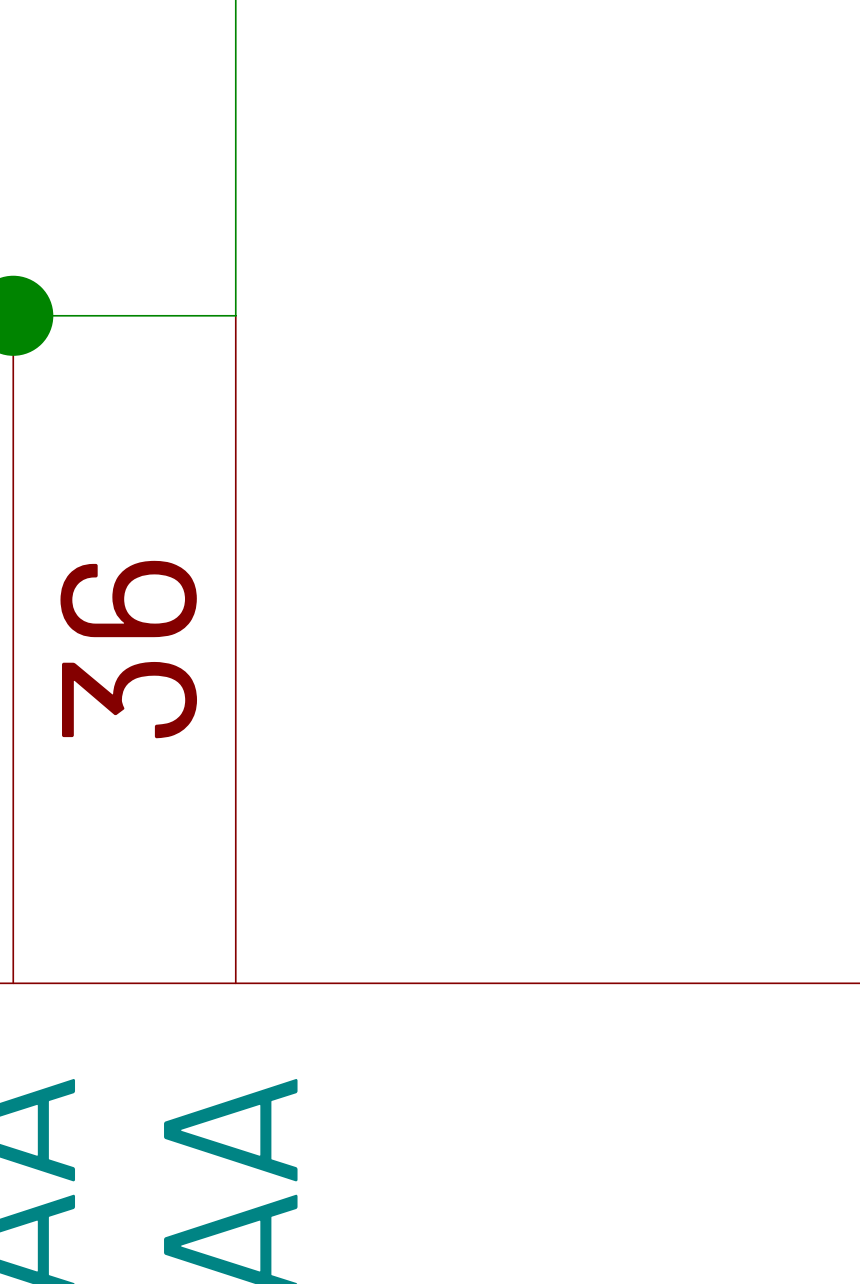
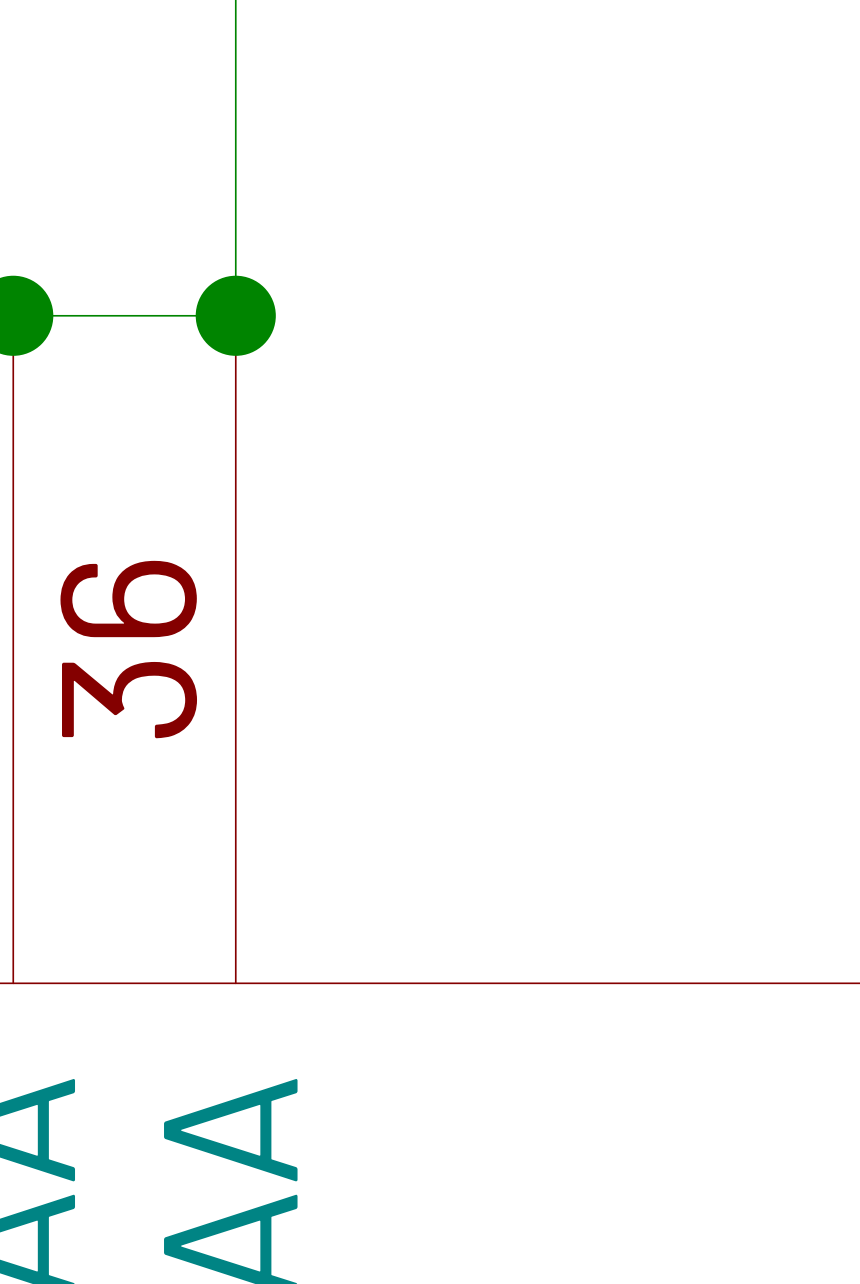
junction: none -> (235, 315)

